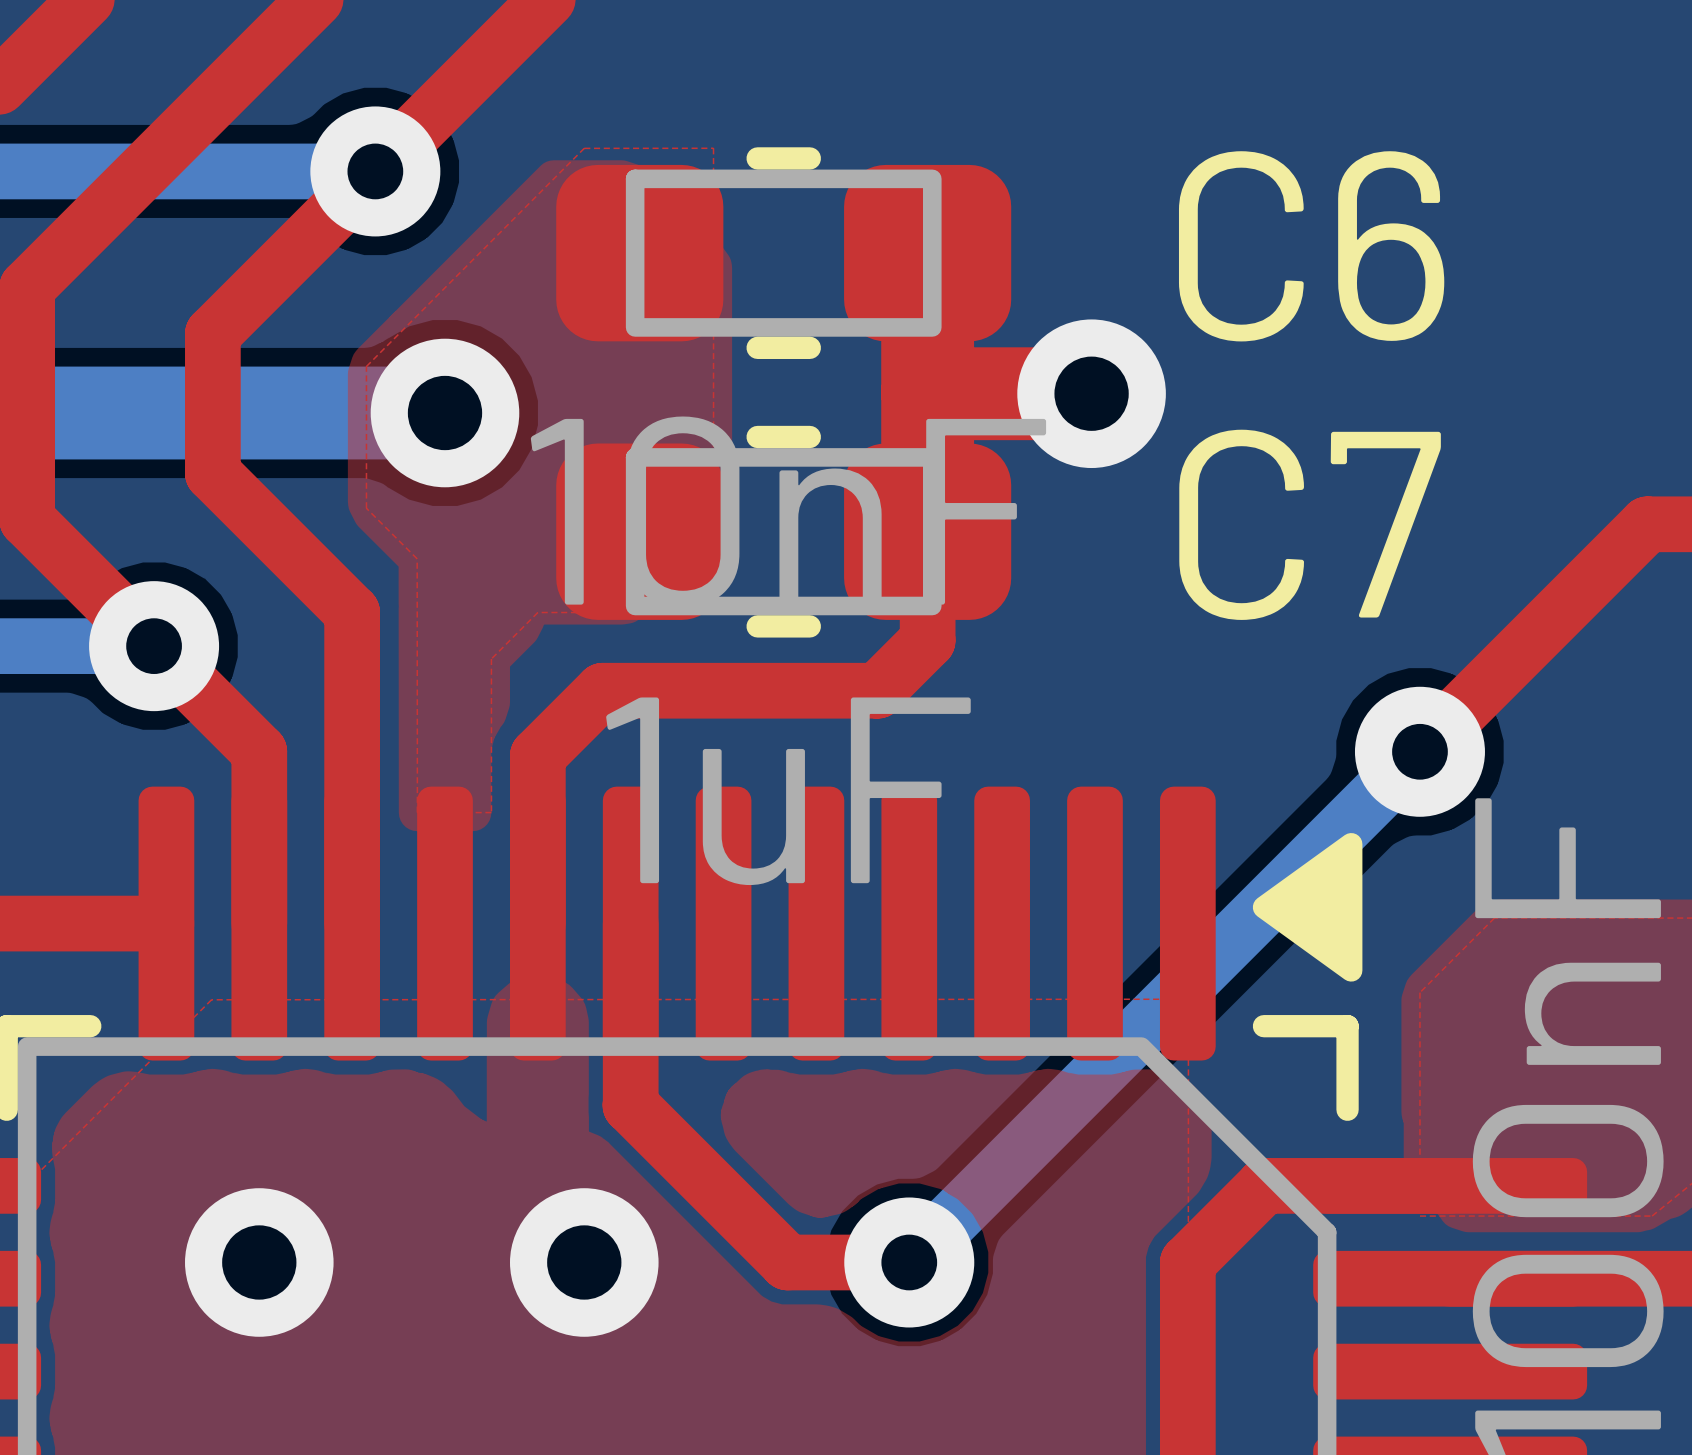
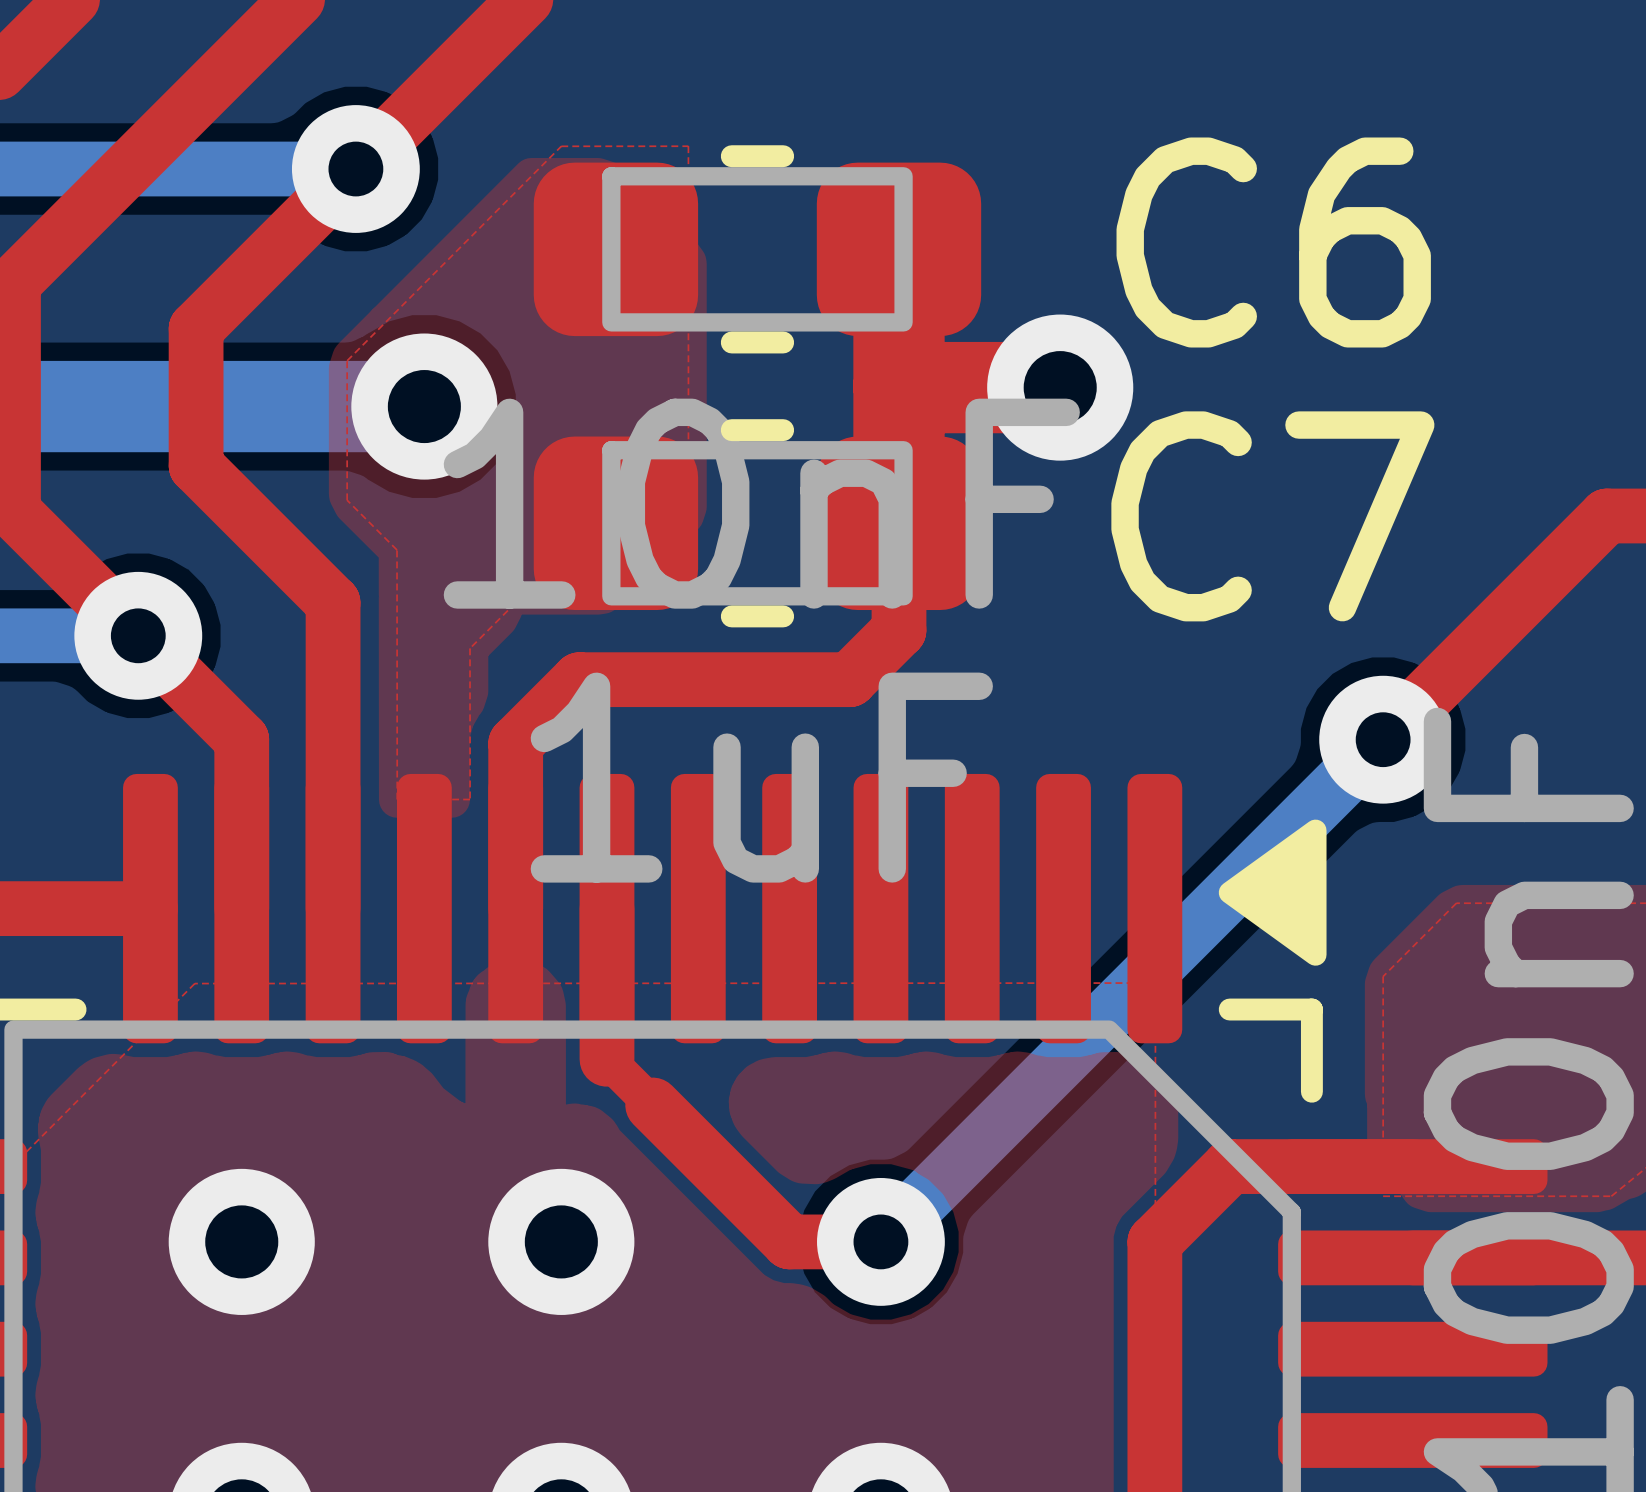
top track: (630, 1076) (630, 1105) (787, 1262) (816, 1262) -> (606, 1059) (789, 1241)

